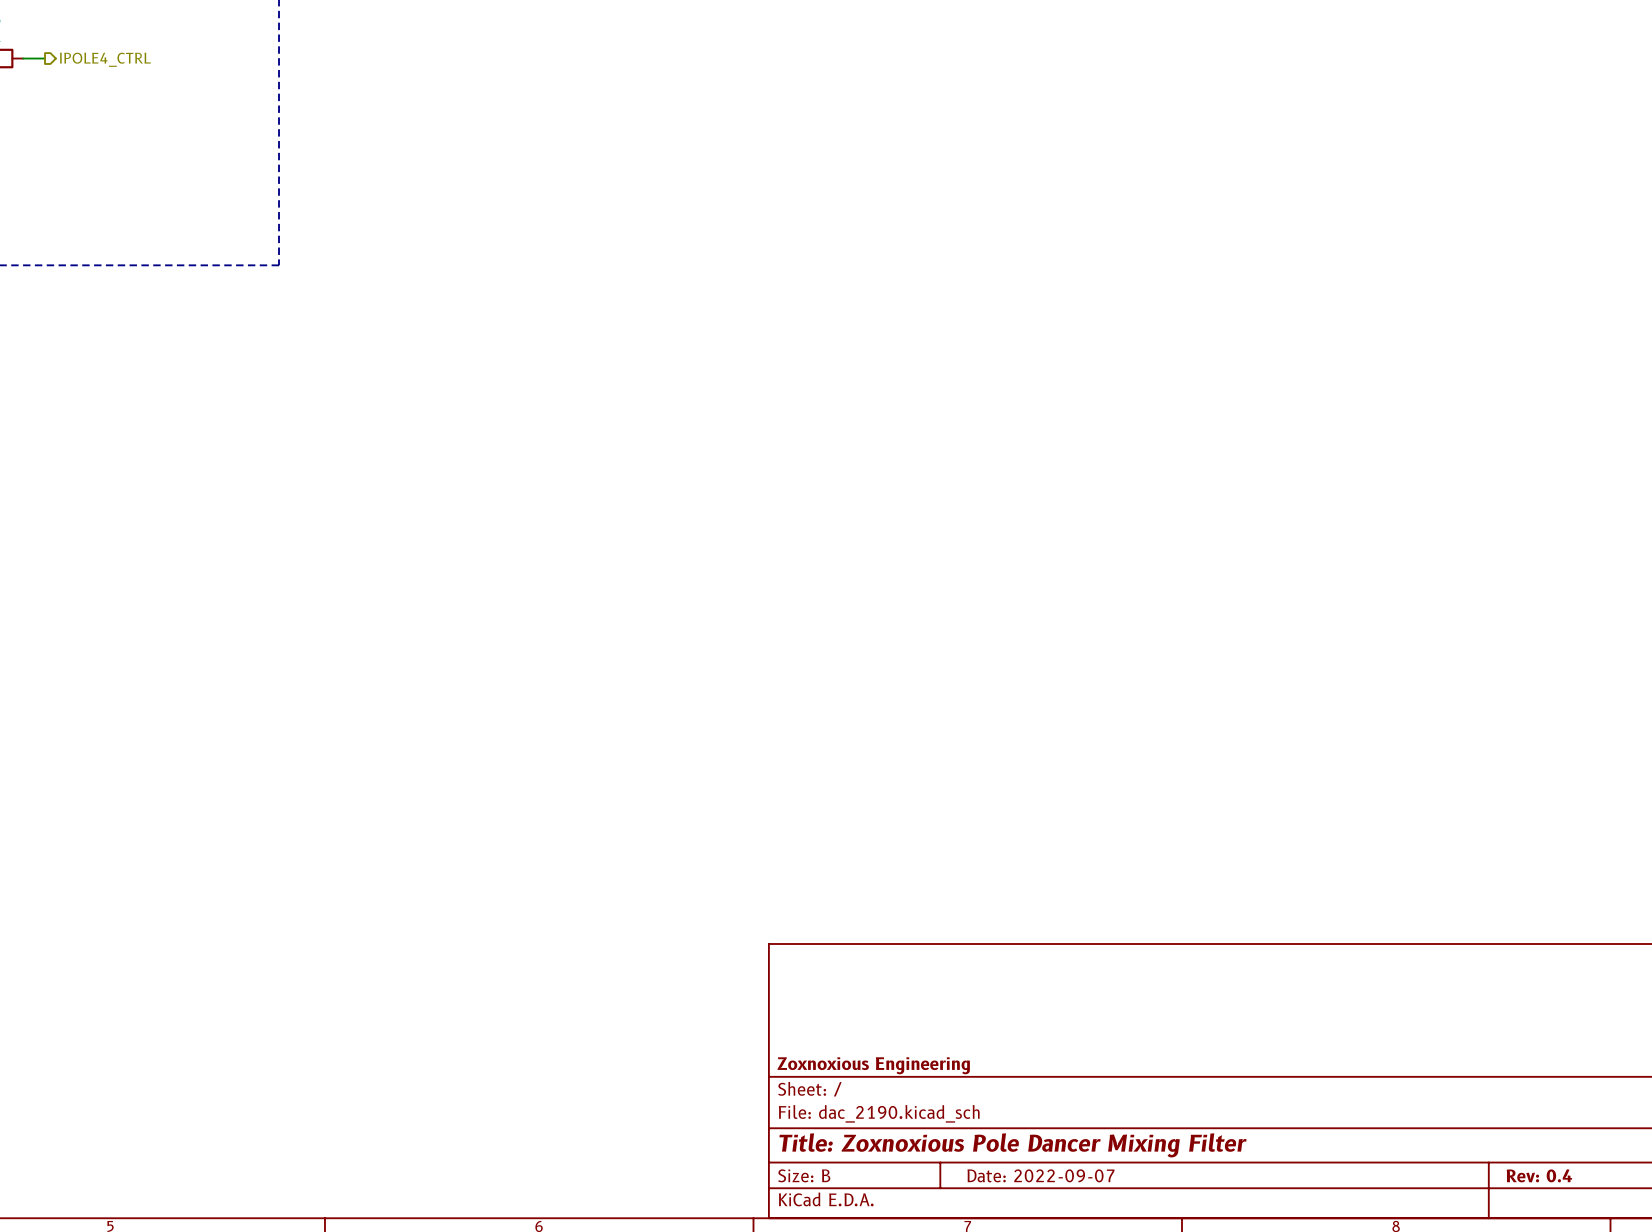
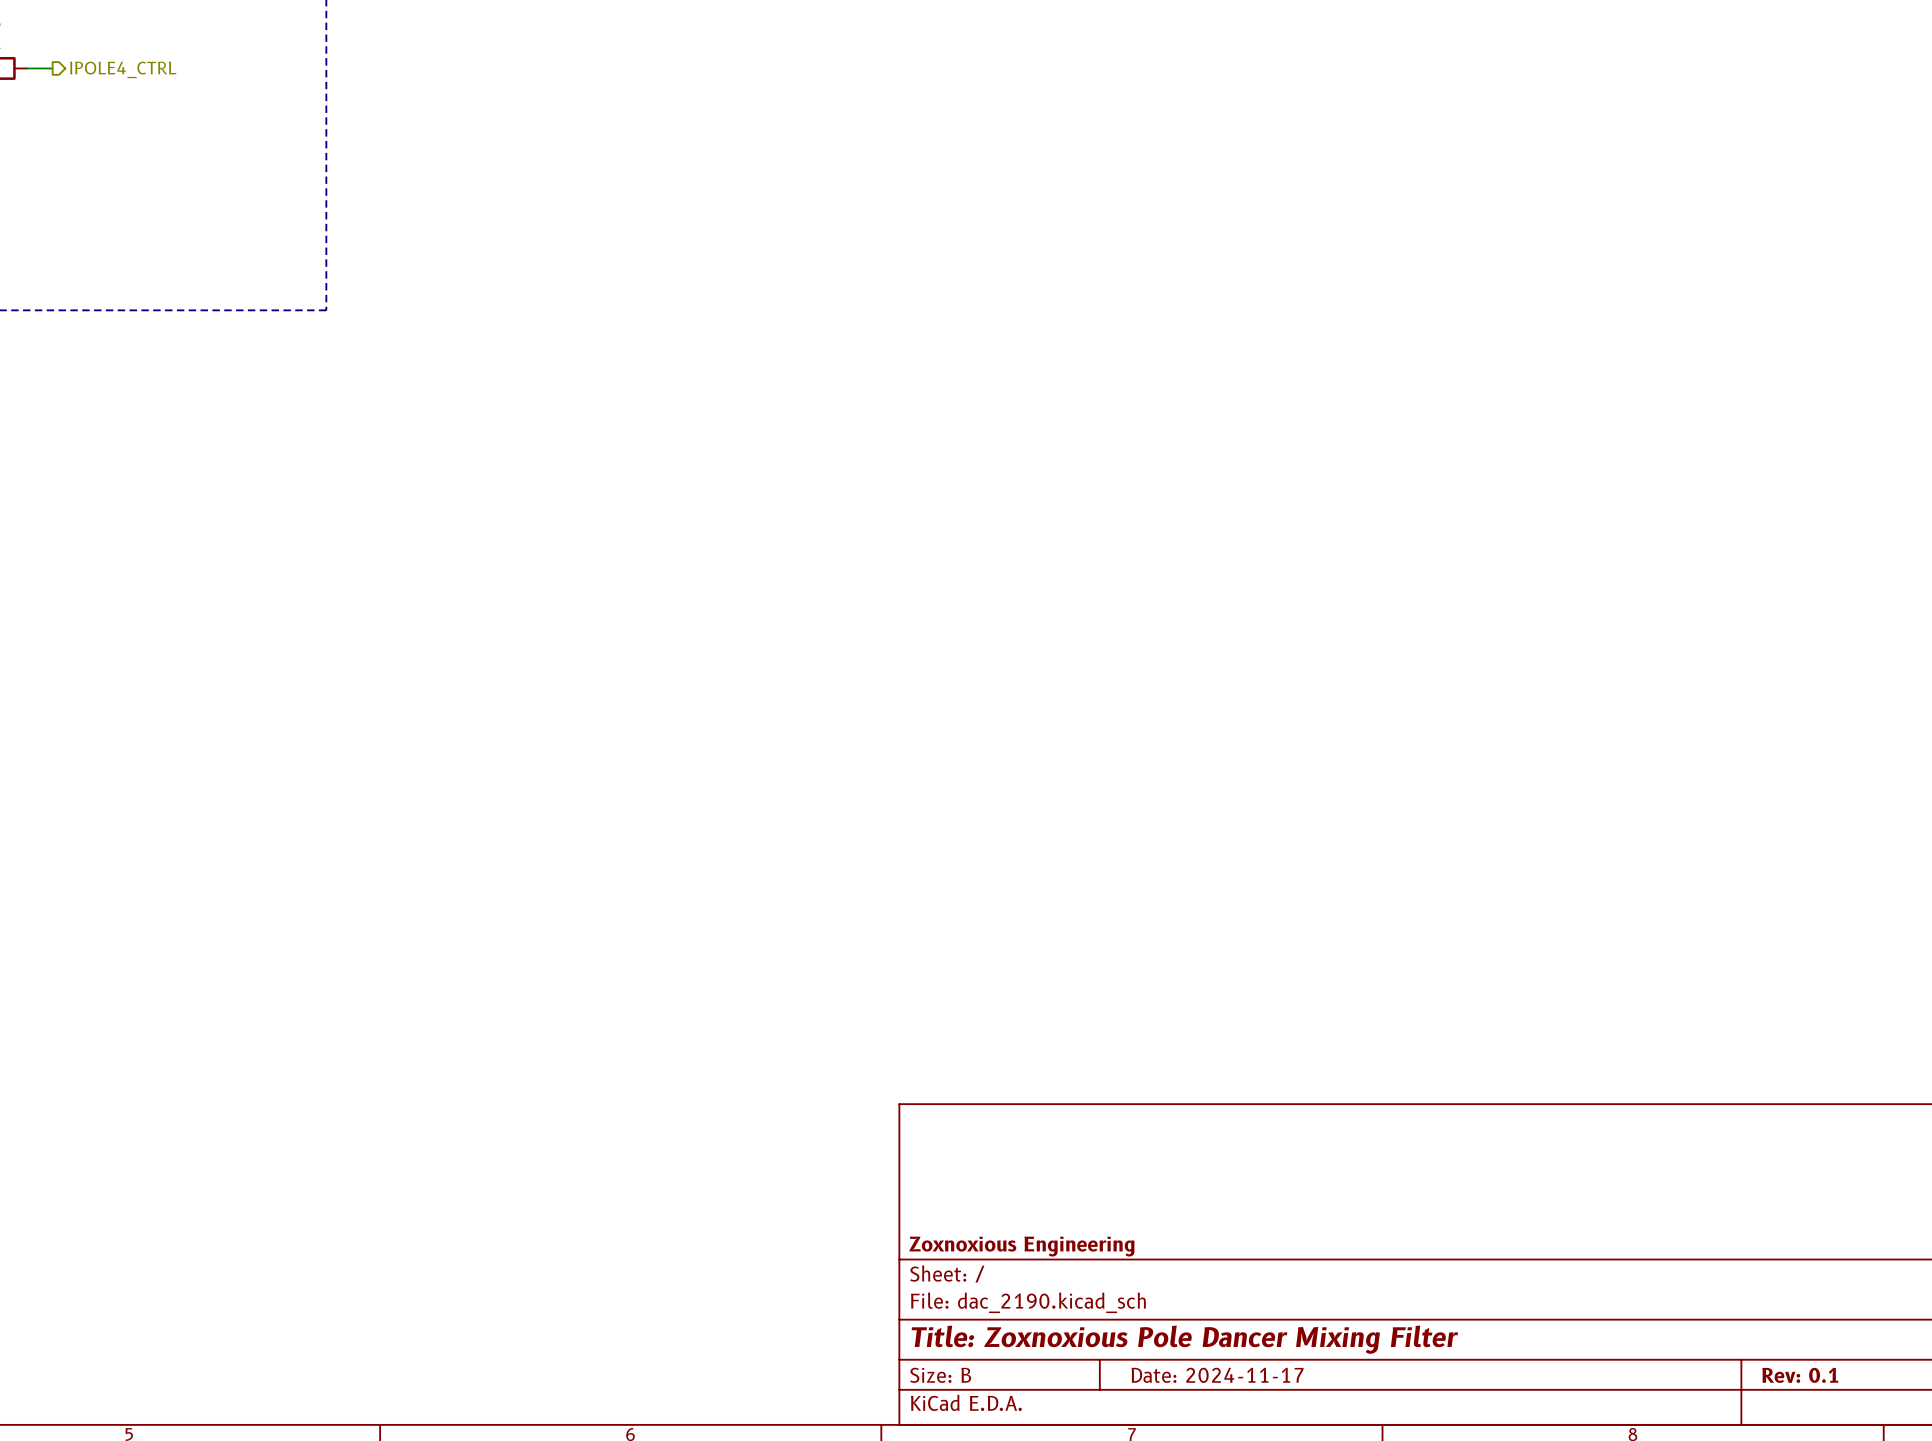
title block: Date: 2022-09-07 (1040, 1175) -> Date: 2024-11-17 (1217, 1375)
title block: Rev: 0.4 (1539, 1175) -> Rev: 0.1 (1800, 1375)

